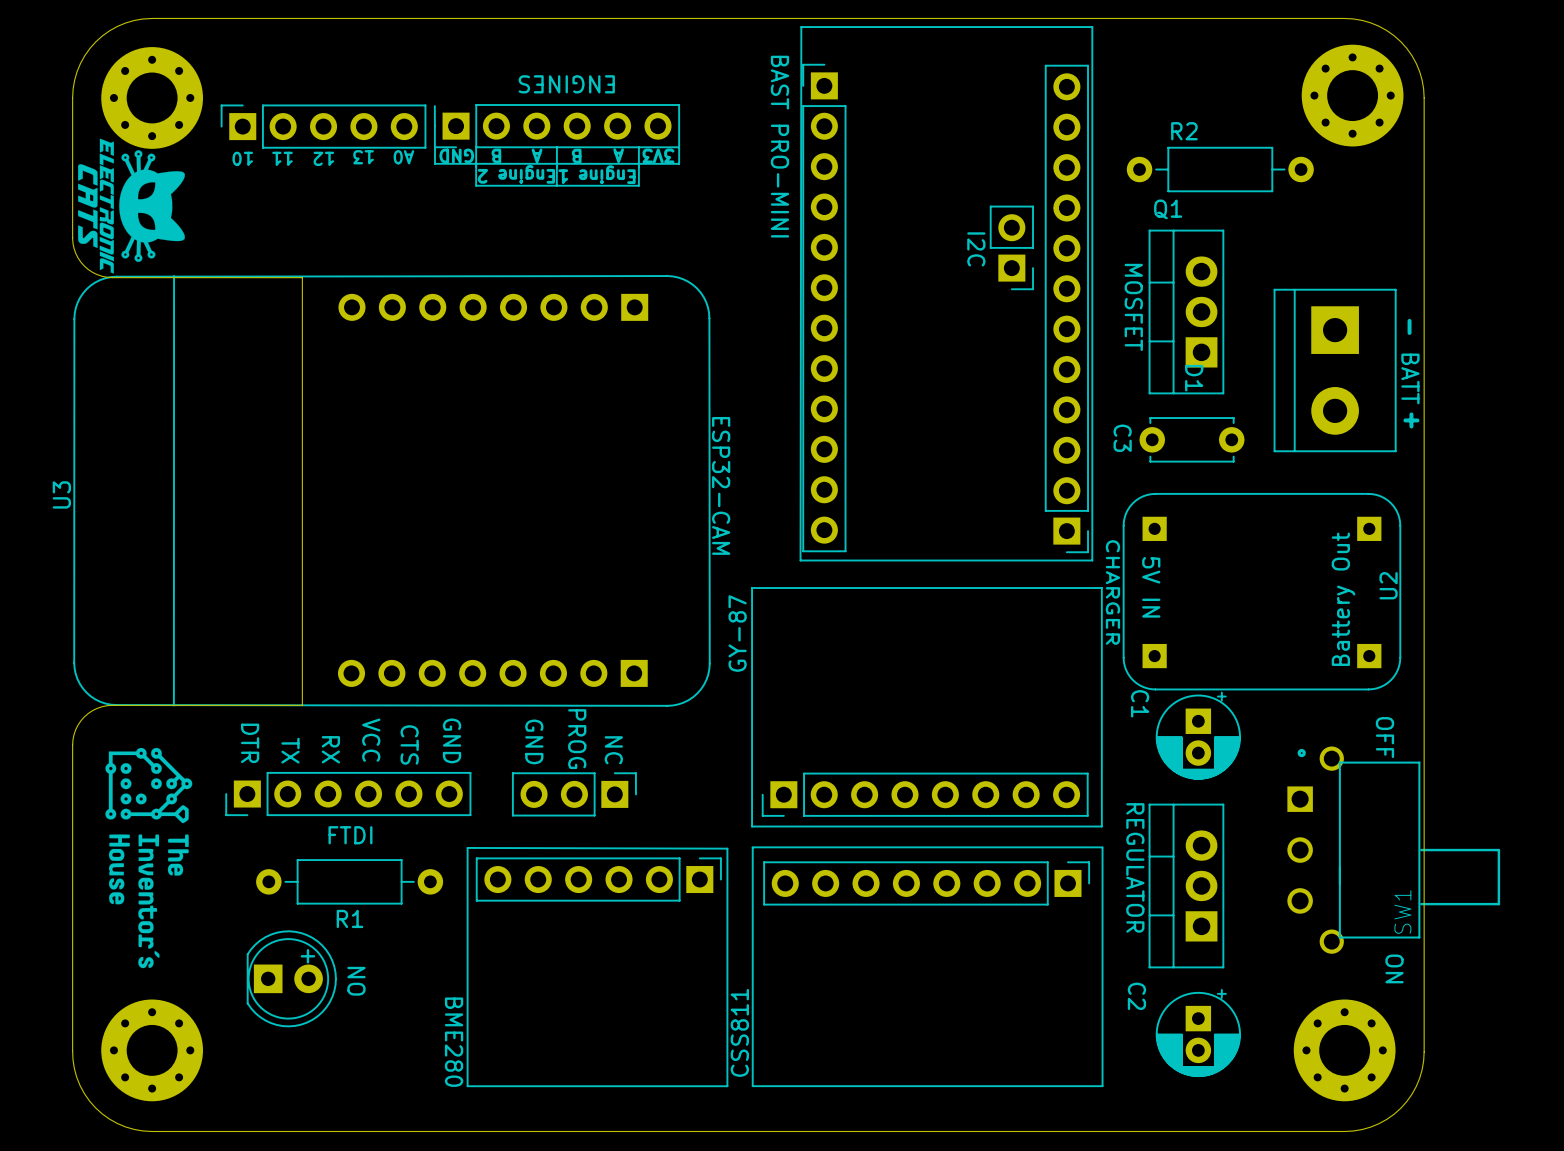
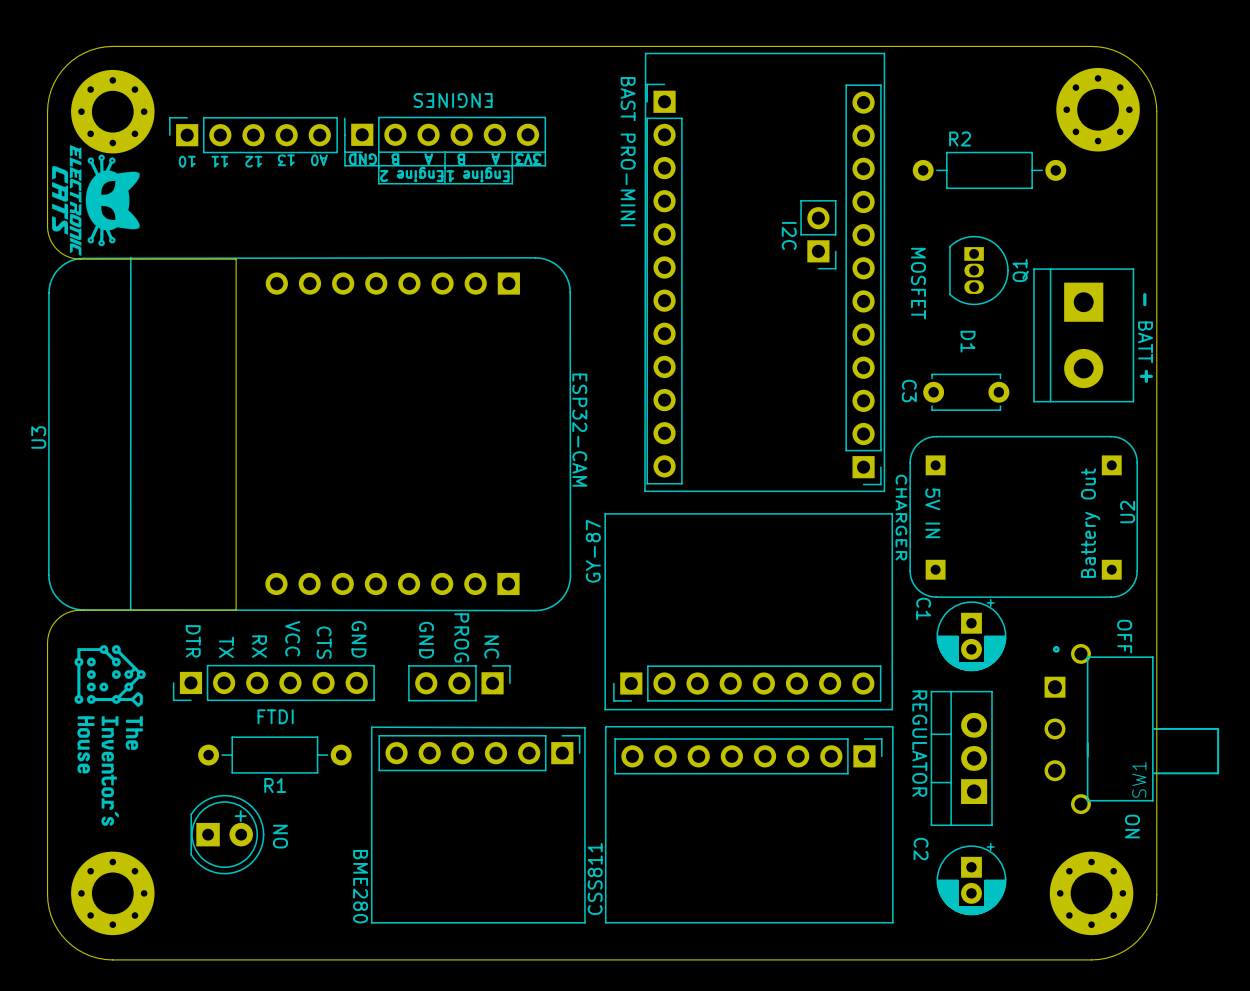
Q1 name position: Q1 (1168, 209) -> Q1 (1020, 270)
Q1 footprint: [1148, 229, 1225, 395] -> [949, 235, 1009, 306]

